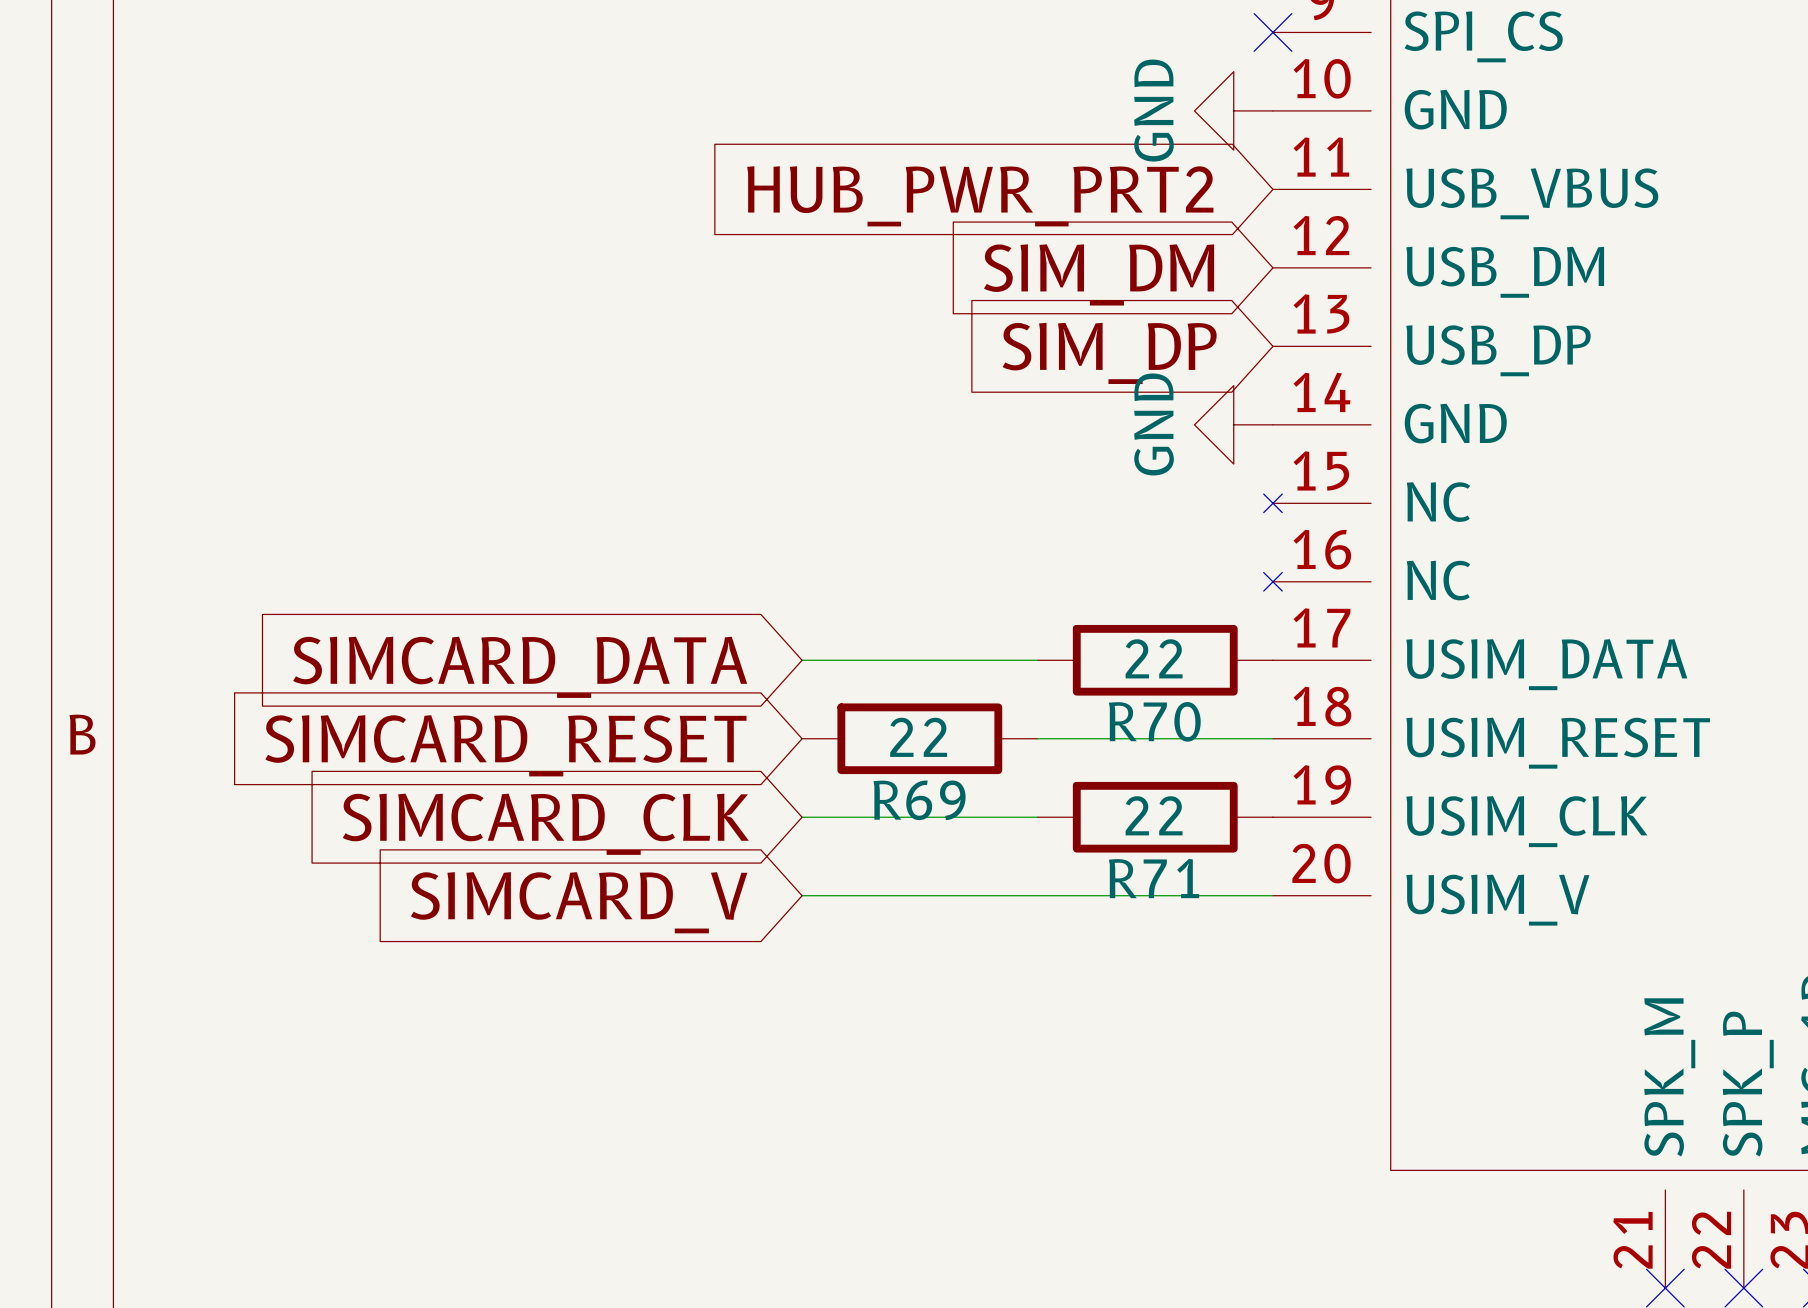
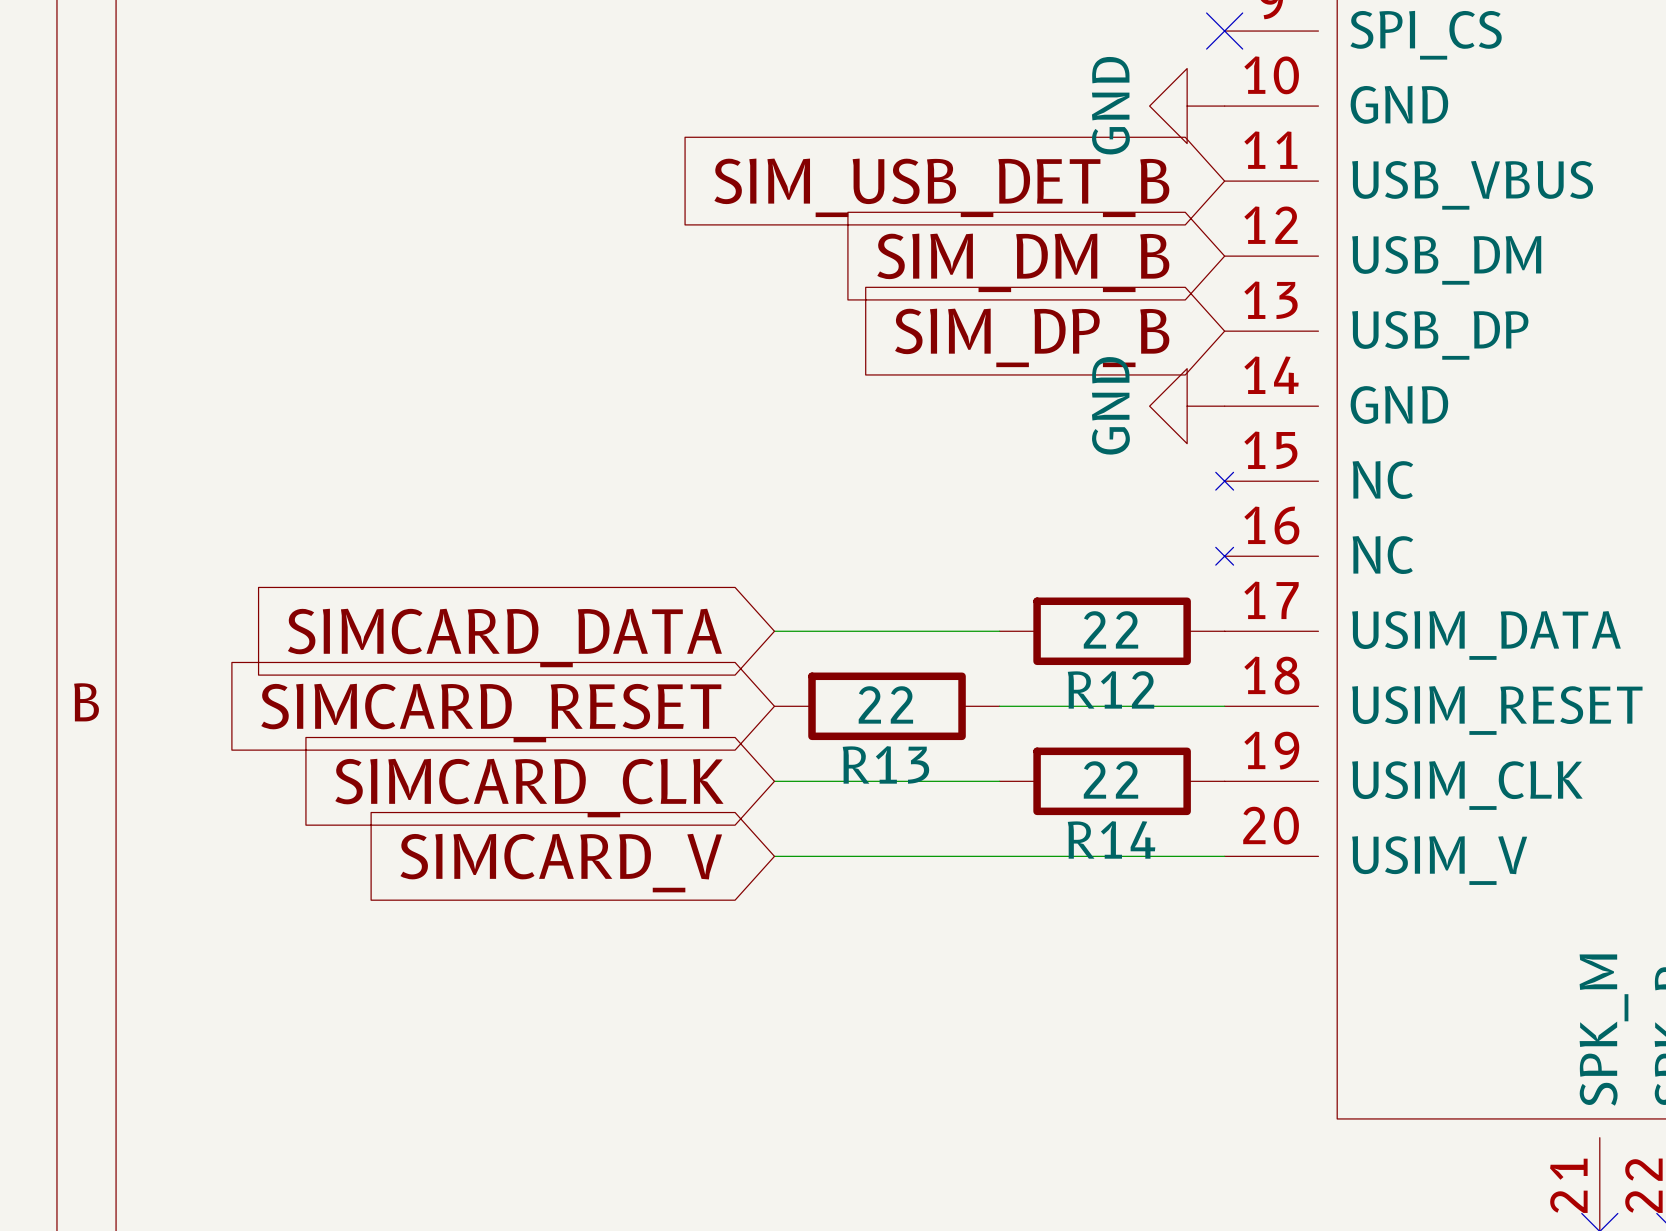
global label: HUB_PWR_PRT2 (980, 196) -> SIM_USB_DET_B (941, 187)
global label: SIM_DM (1099, 274) -> SIM_DM_B (1023, 262)
global label: SIM_DP (1109, 353) -> SIM_DP_B (1032, 337)
R70 name: R70 (1154, 721) -> R12 (1111, 689)
R69 name: R69 (919, 800) -> R13 (885, 764)
R71 name: R71 (1154, 878) -> R14 (1111, 839)

